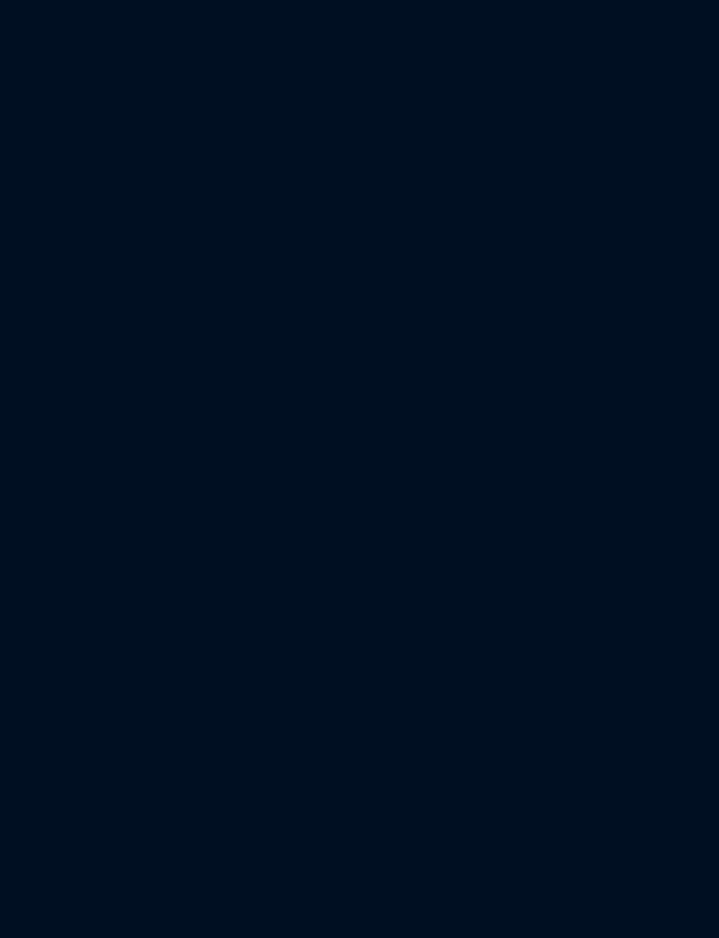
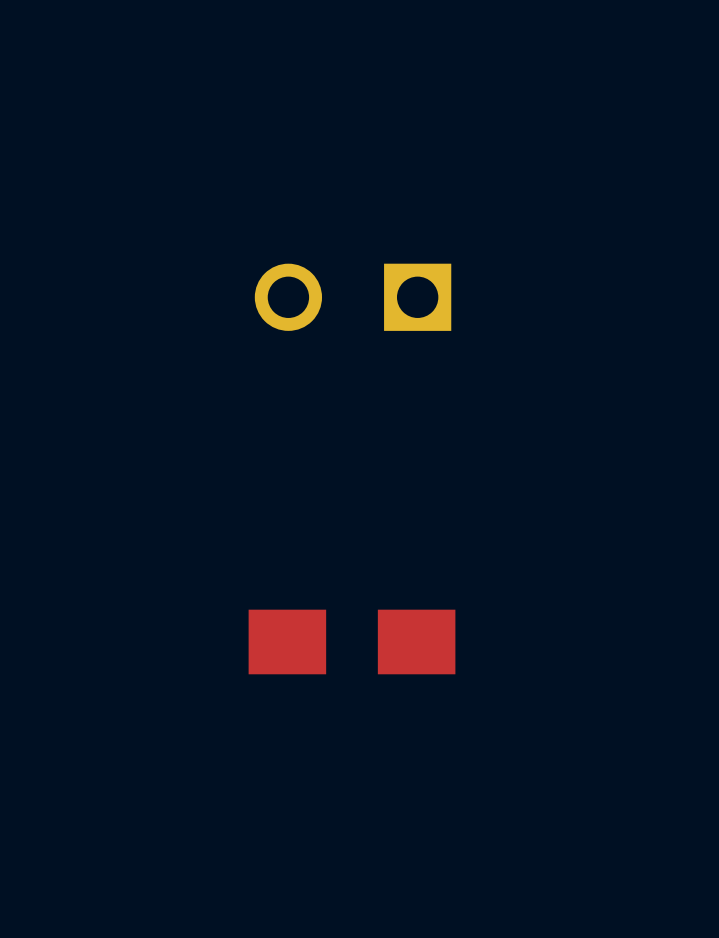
part: none -> (353, 297)
part: none -> (352, 641)

